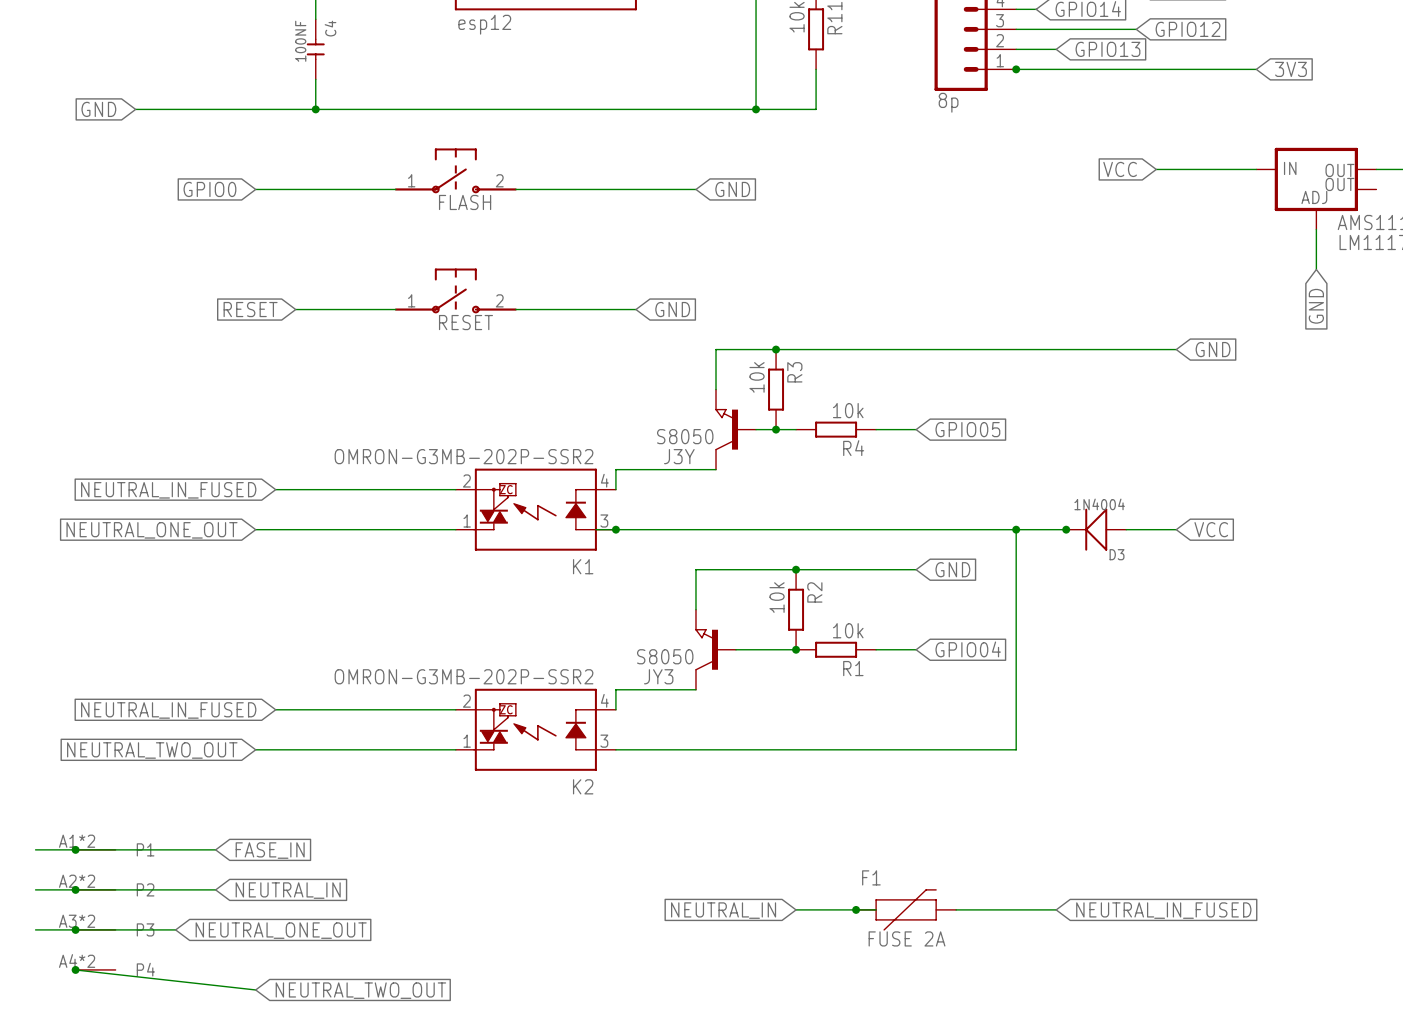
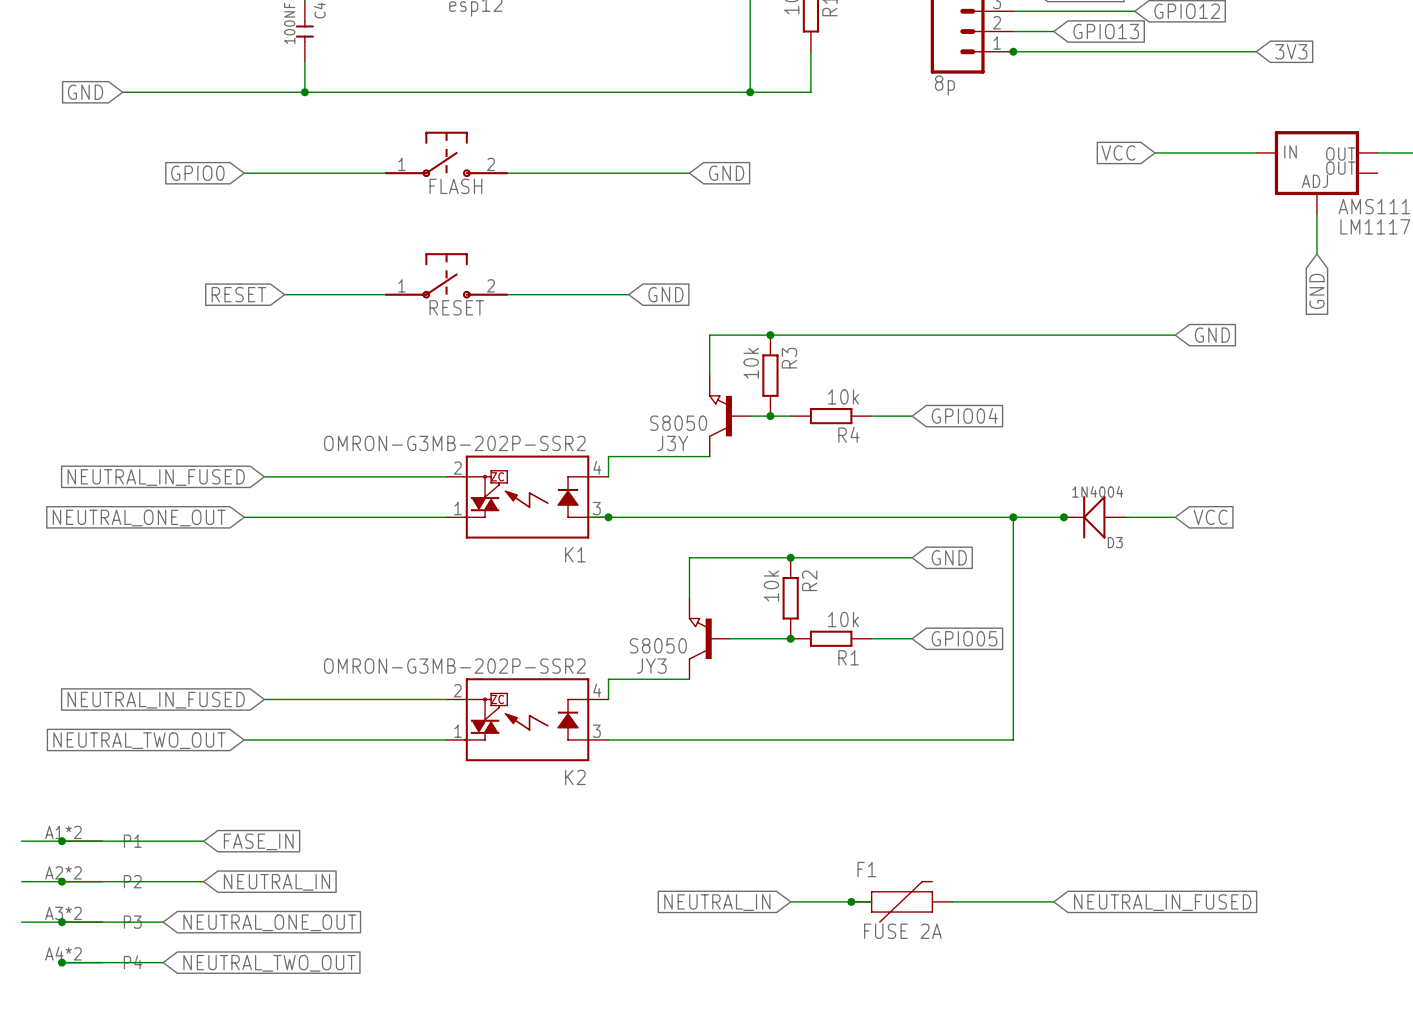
global label: GPIO05 (967, 429) -> GPIO04 (964, 415)
global label: GPIO04 (968, 649) -> GPIO05 (964, 638)
wire: (75, 969) (255, 989) -> (61, 962) (163, 962)
global label position: NEUTRAL_TWO_OUT (360, 990) -> NEUTRAL_TWO_OUT (269, 963)

